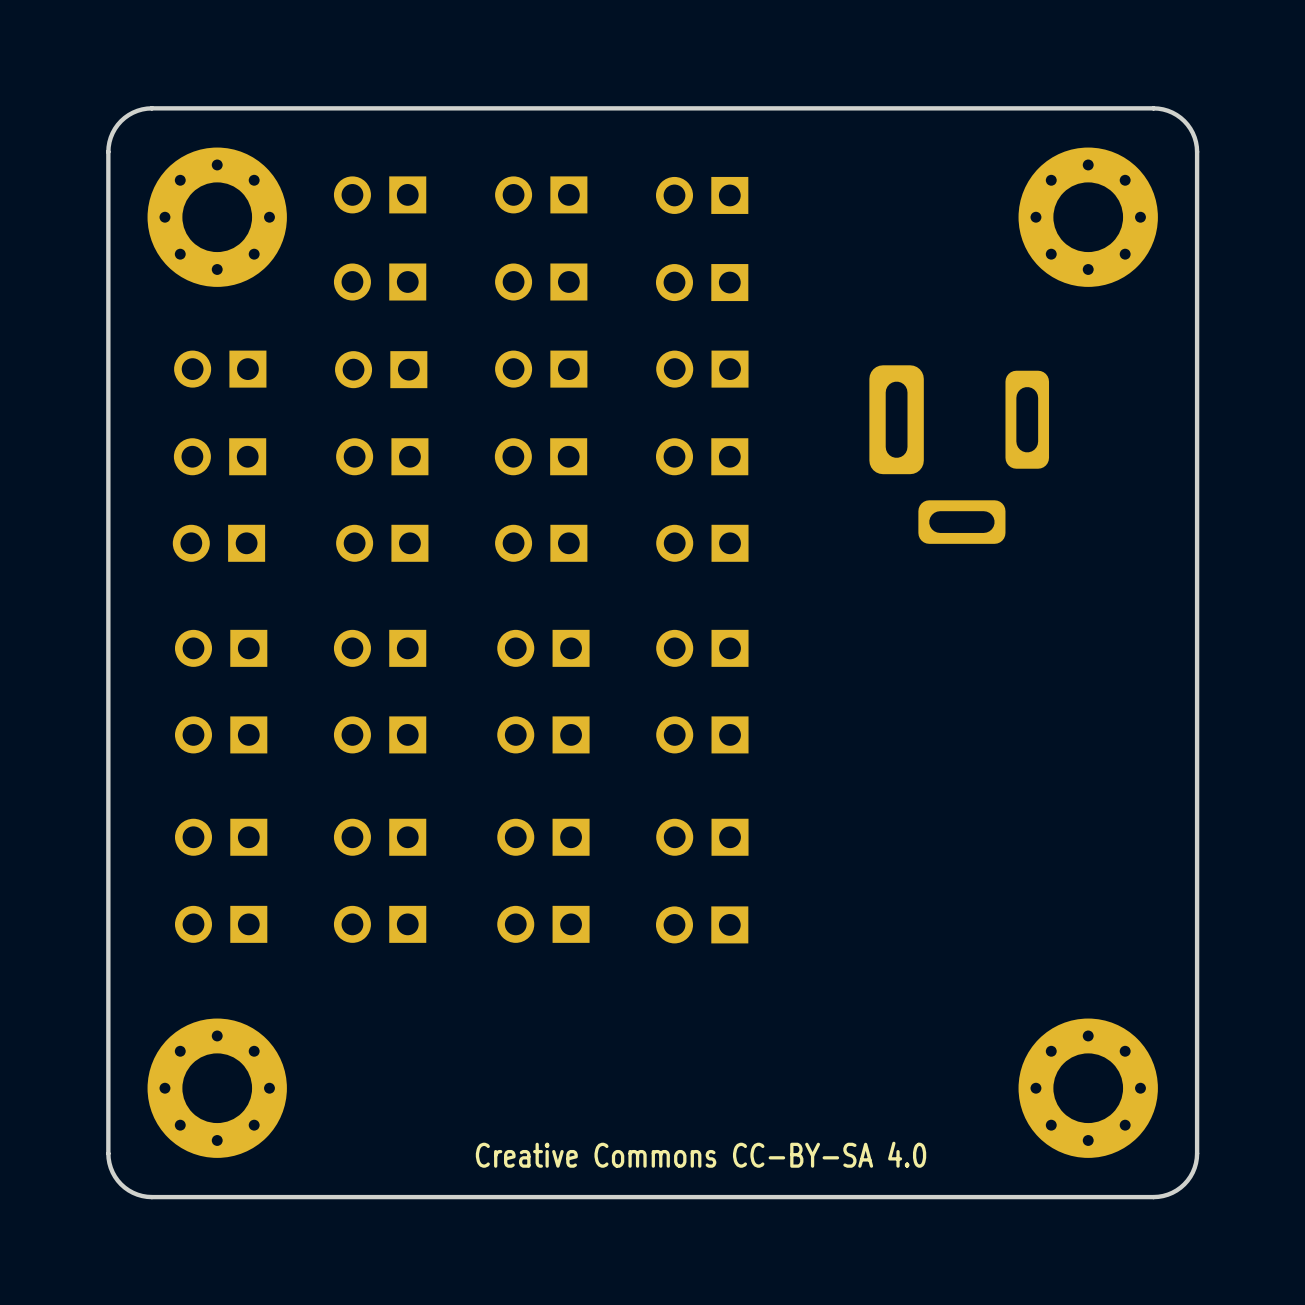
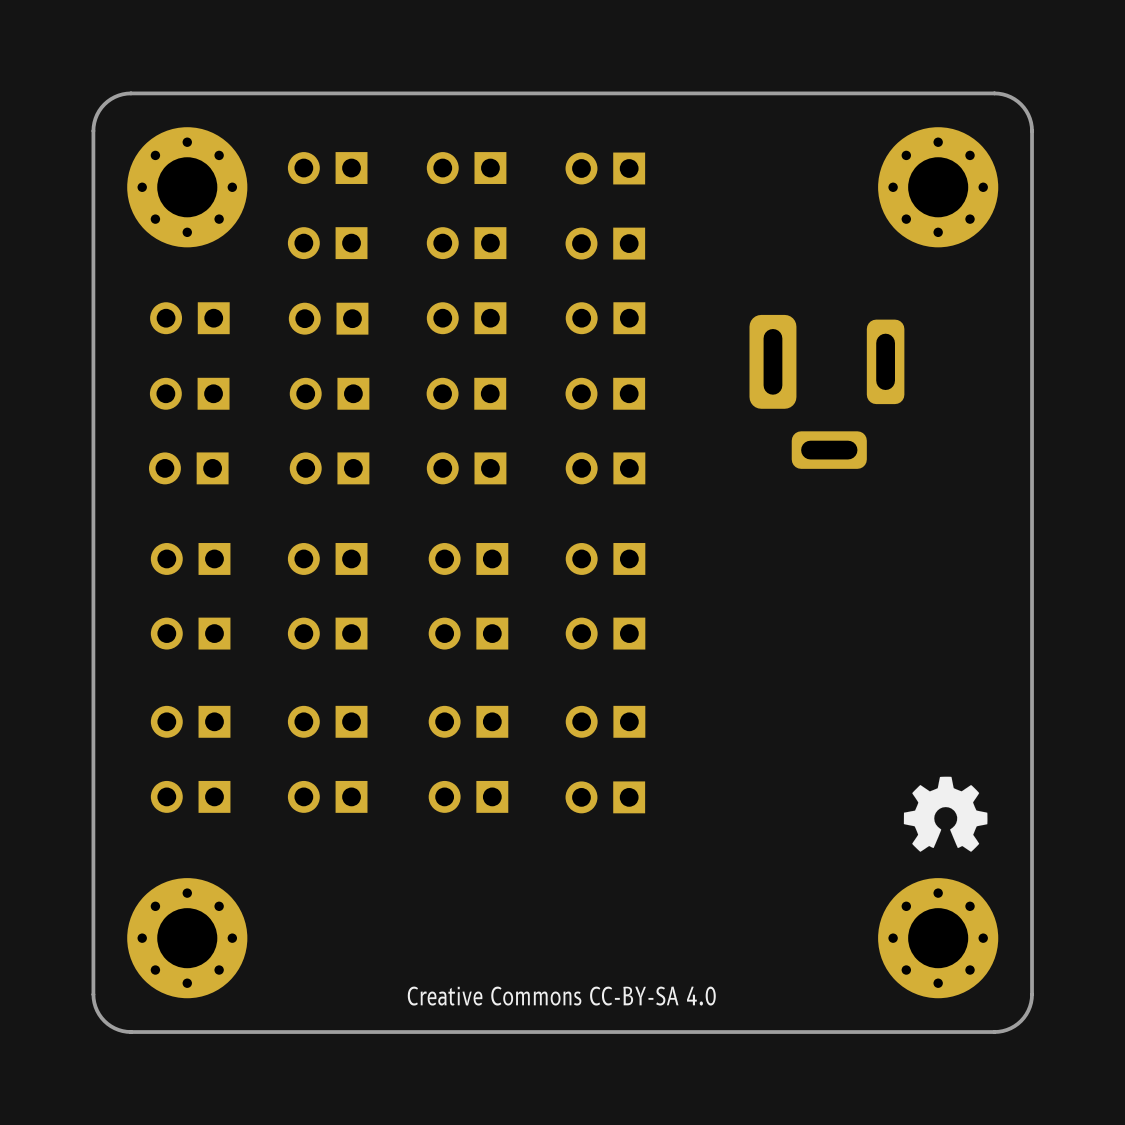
drawing: none -> [903, 776, 988, 852]

